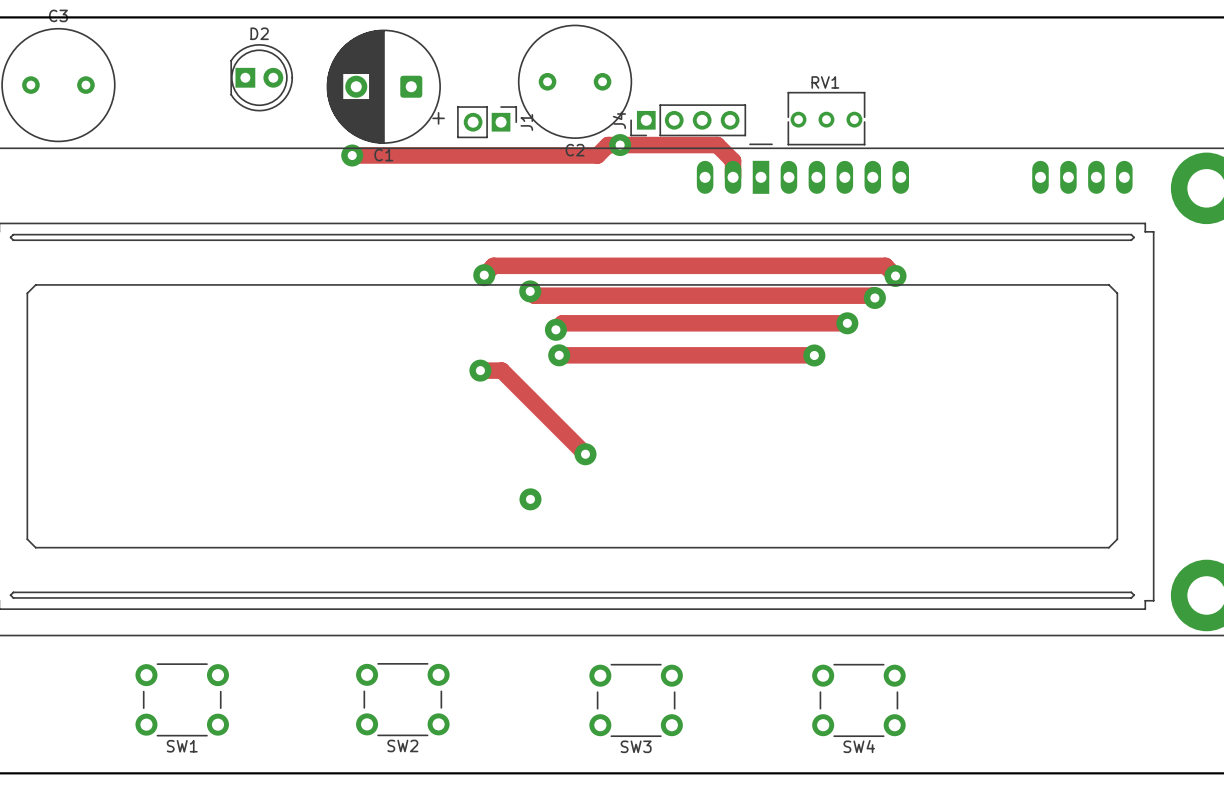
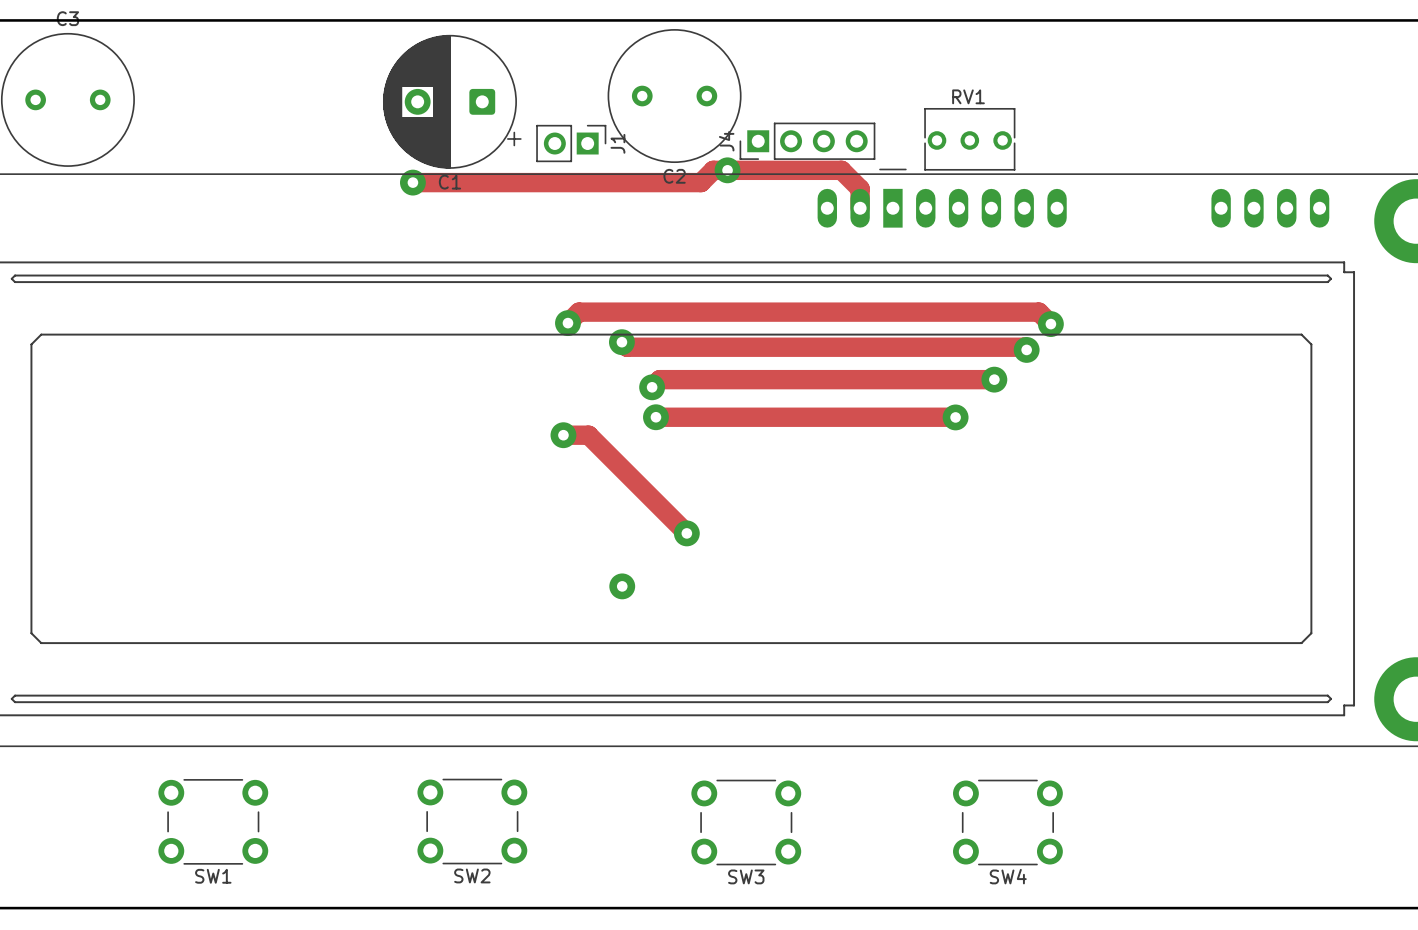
D2: (261, 77) -> none

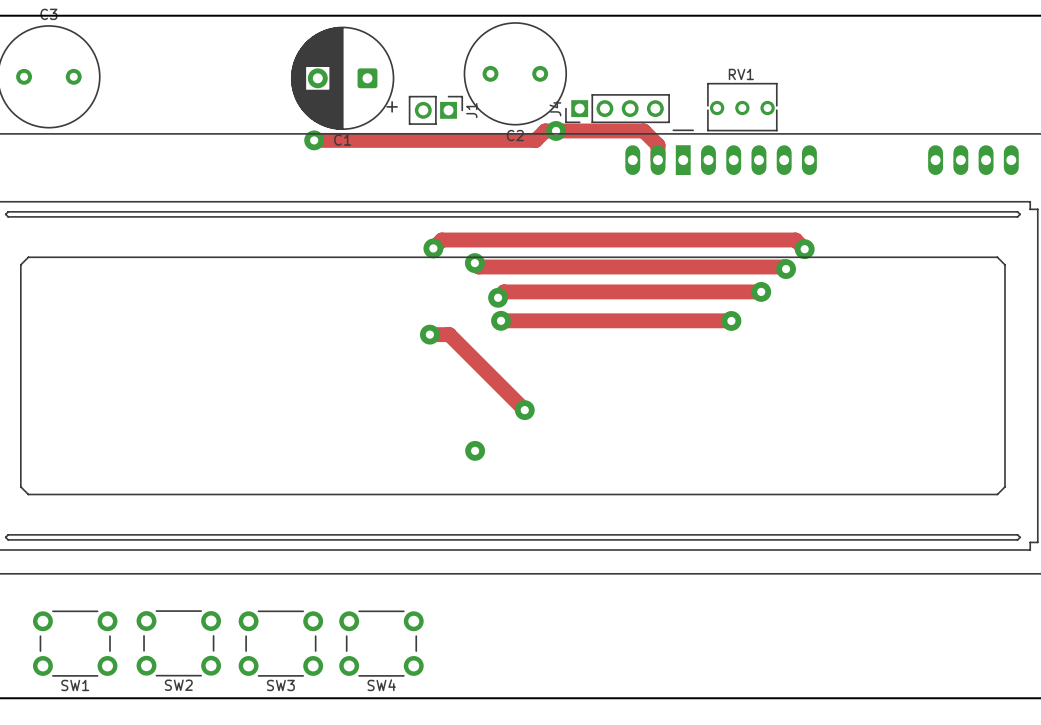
SW1 position: (213, 821) -> (75, 643)
SW2 position: (472, 821) -> (178, 643)
SW3 position: (746, 822) -> (280, 643)
SW4 position: (1007, 822) -> (381, 643)

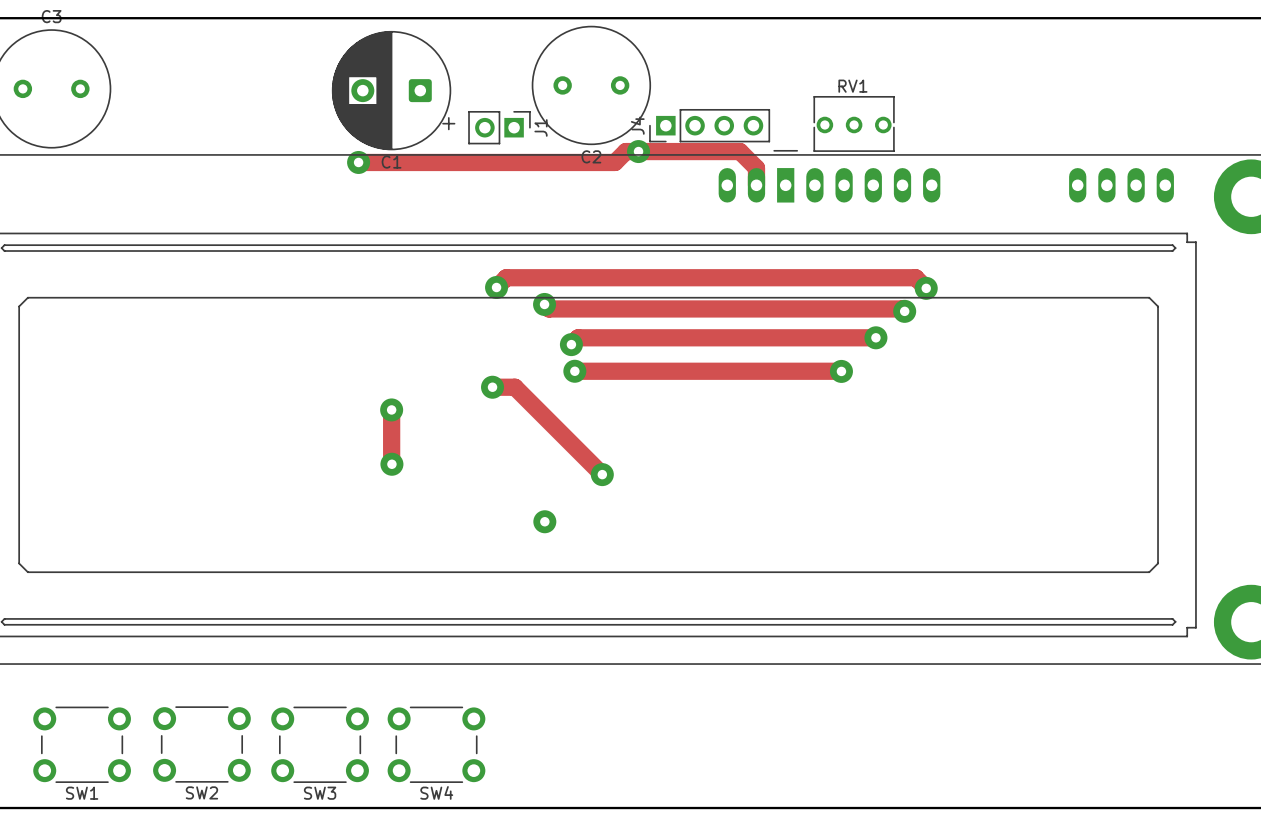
track: none -> (391, 409) (391, 464)
via: none -> (391, 409)
via: none -> (391, 464)

